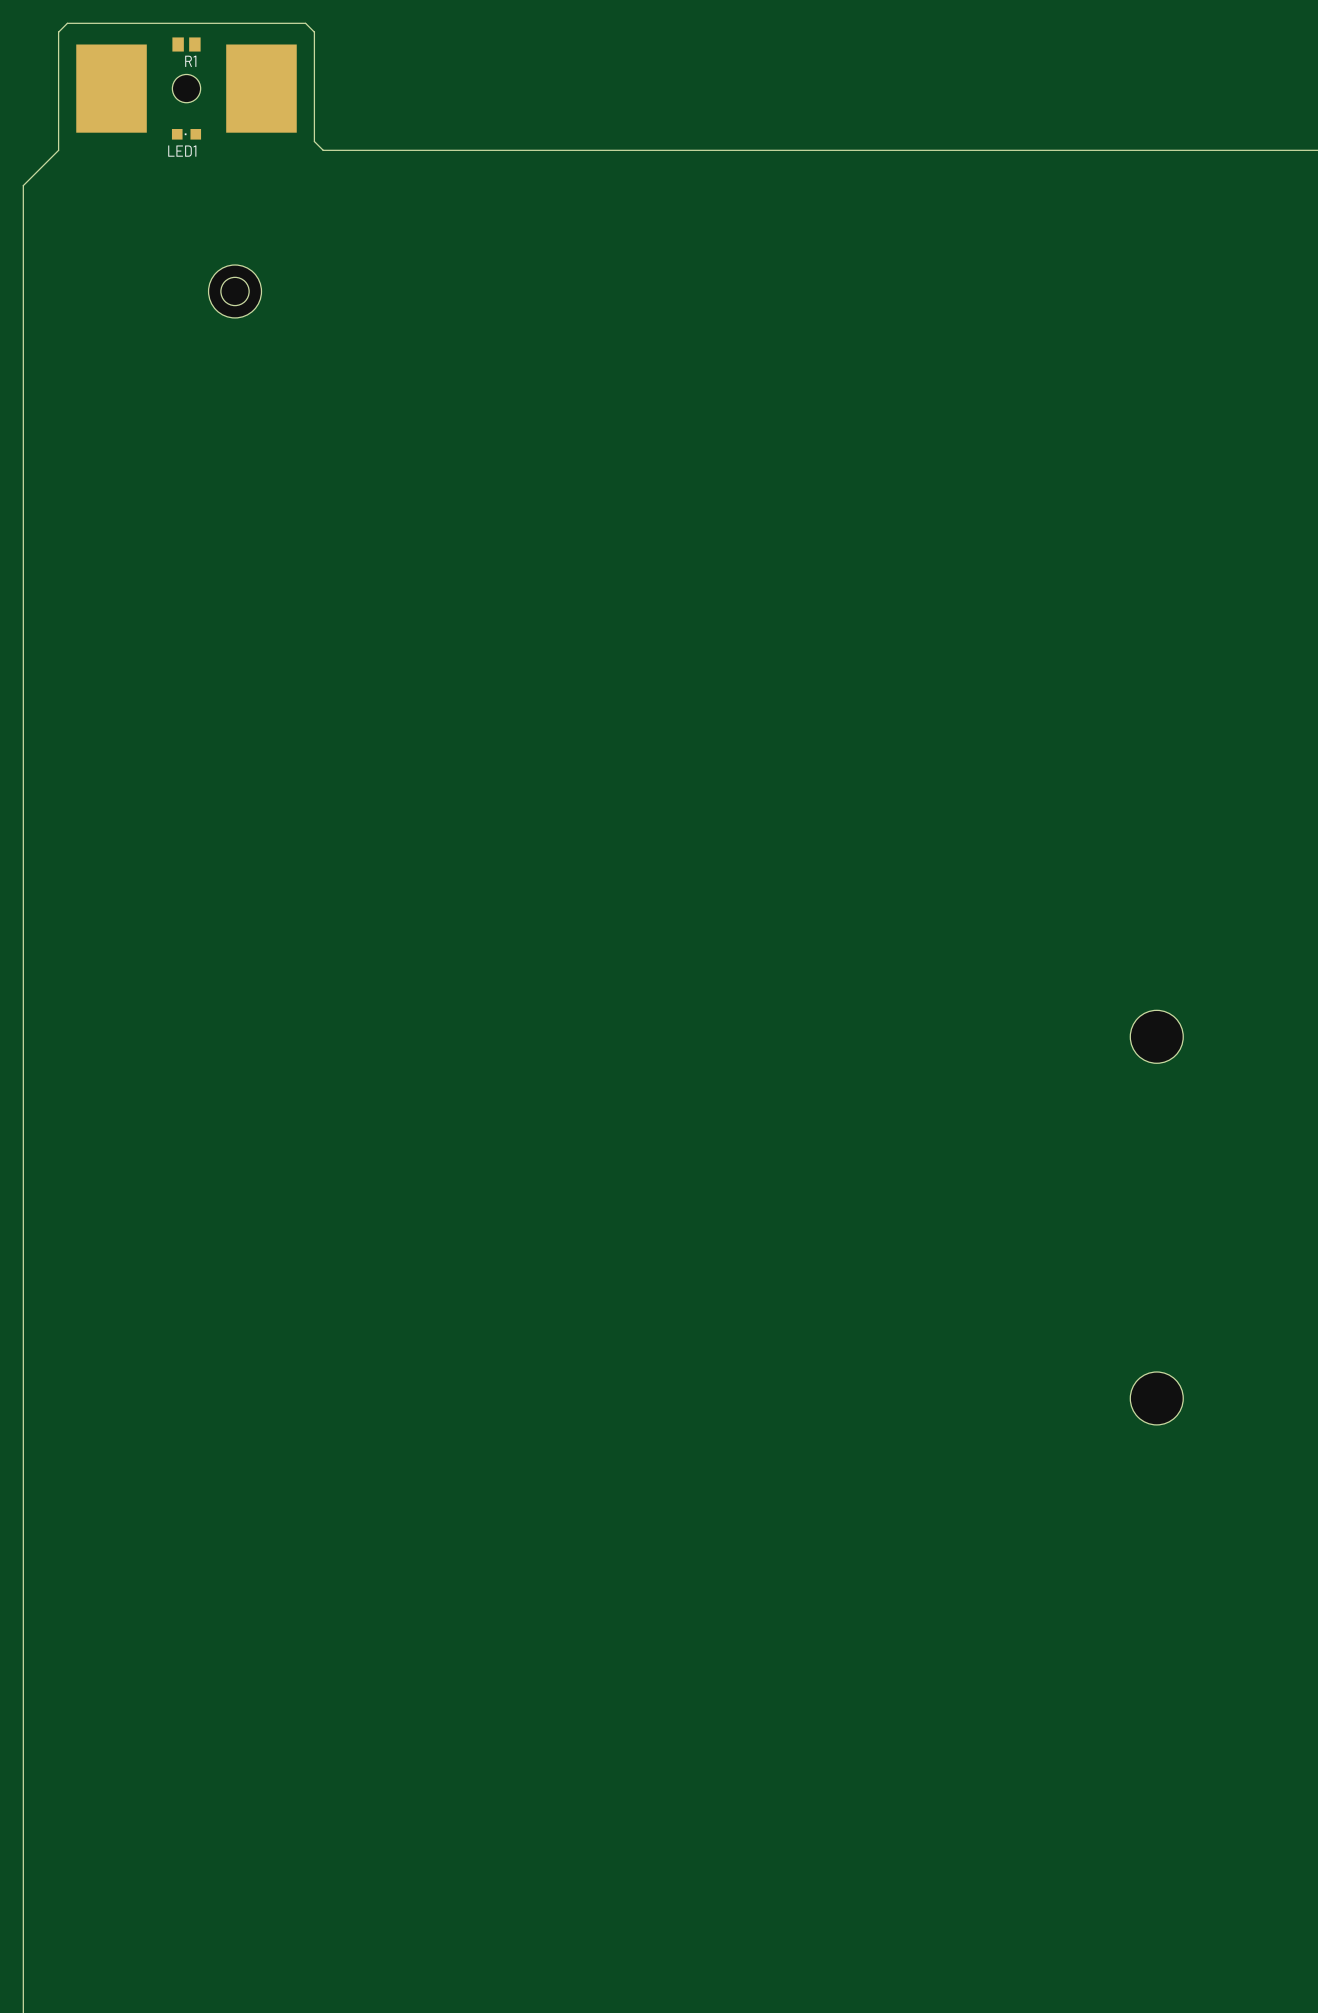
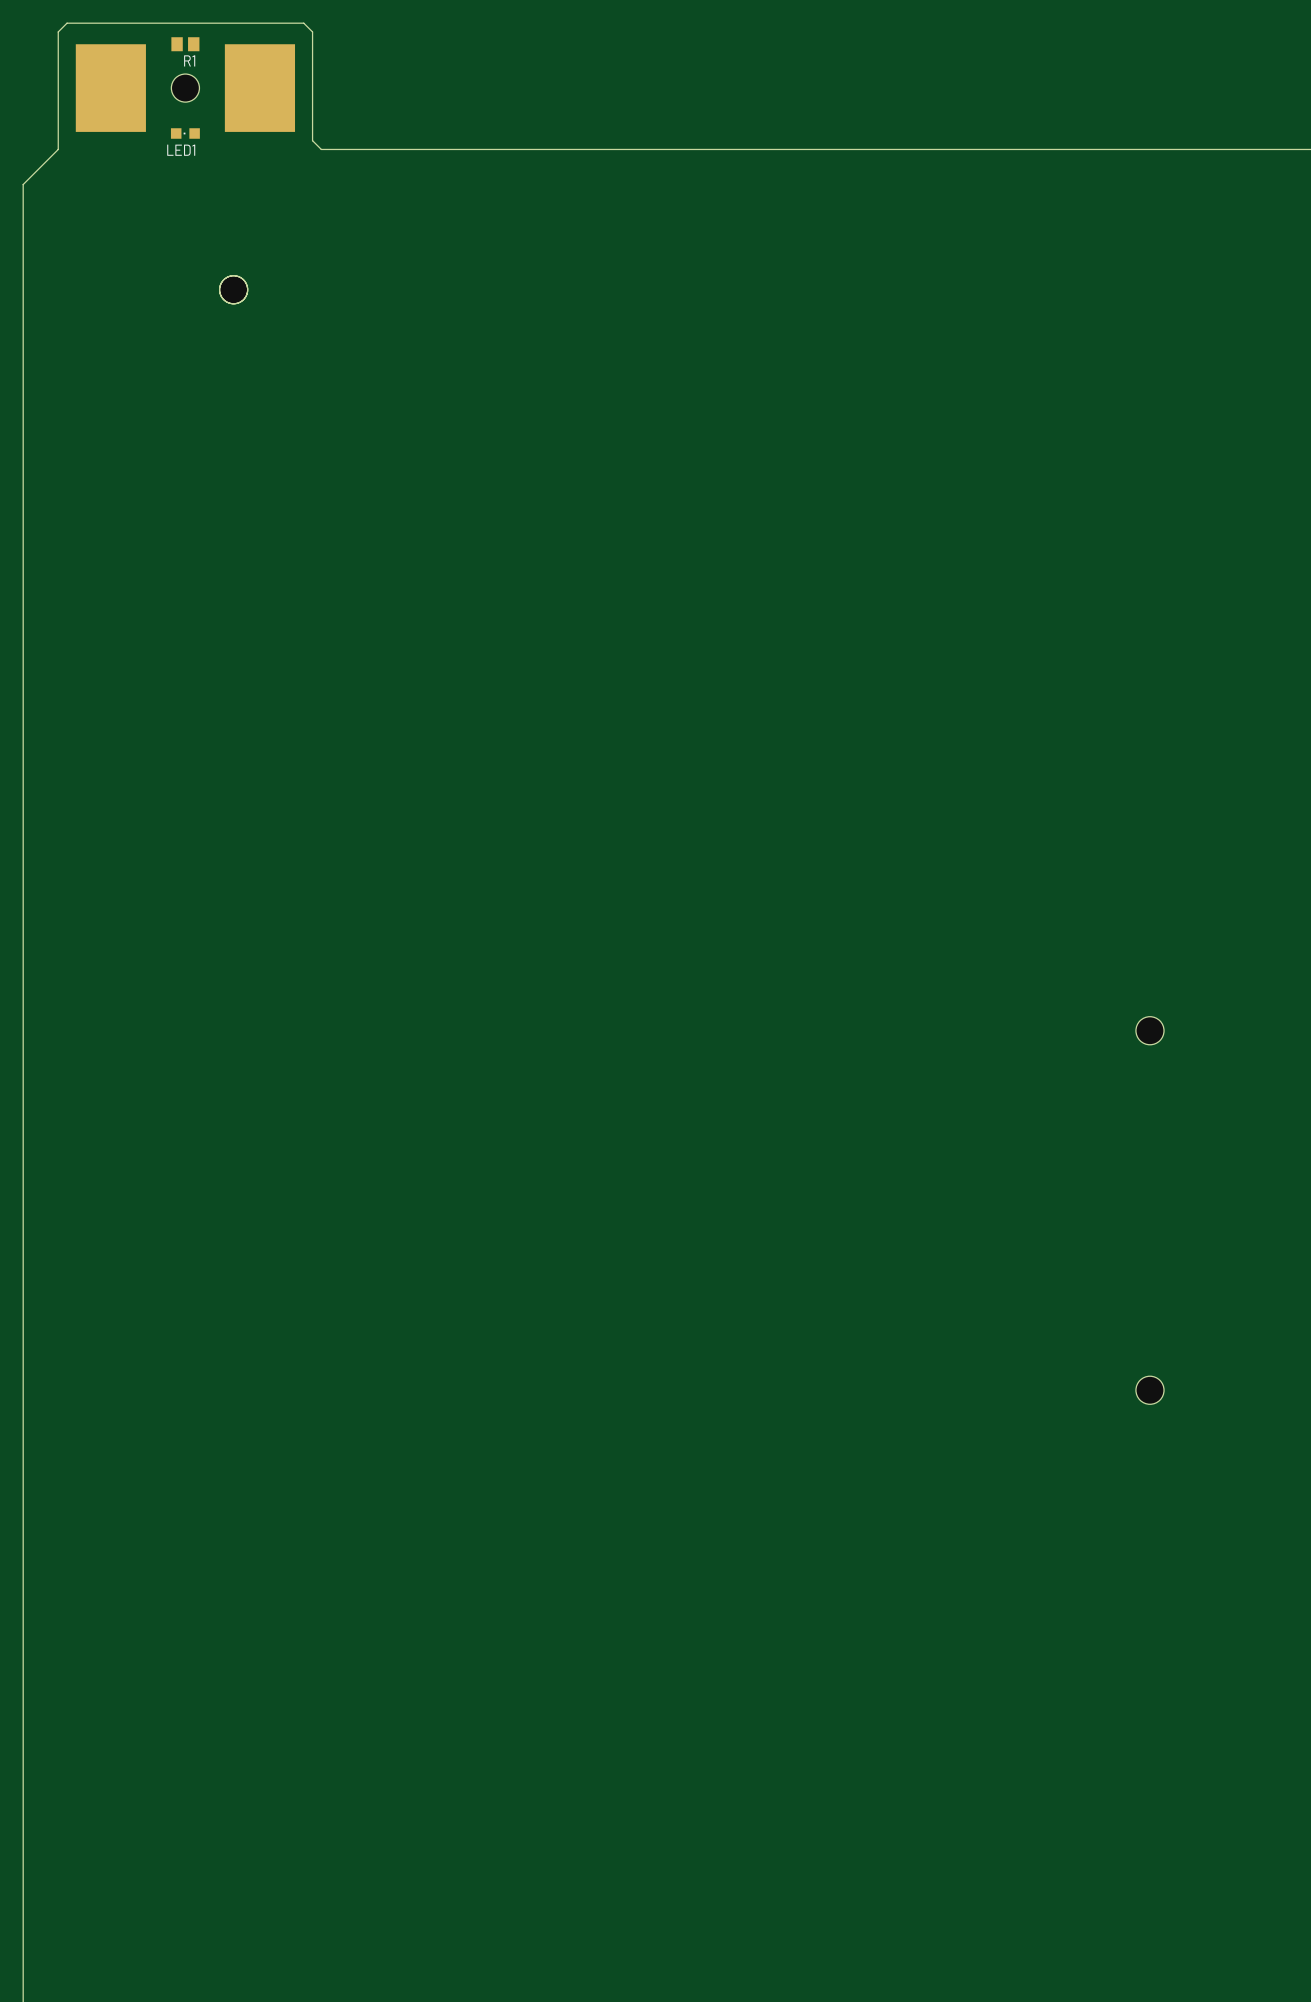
hole: (235, 291) -> none
hole size: [1130, 1010, 1184, 1064] -> [1135, 1016, 1165, 1045]
hole size: [1130, 1372, 1184, 1425] -> [1135, 1376, 1165, 1405]

